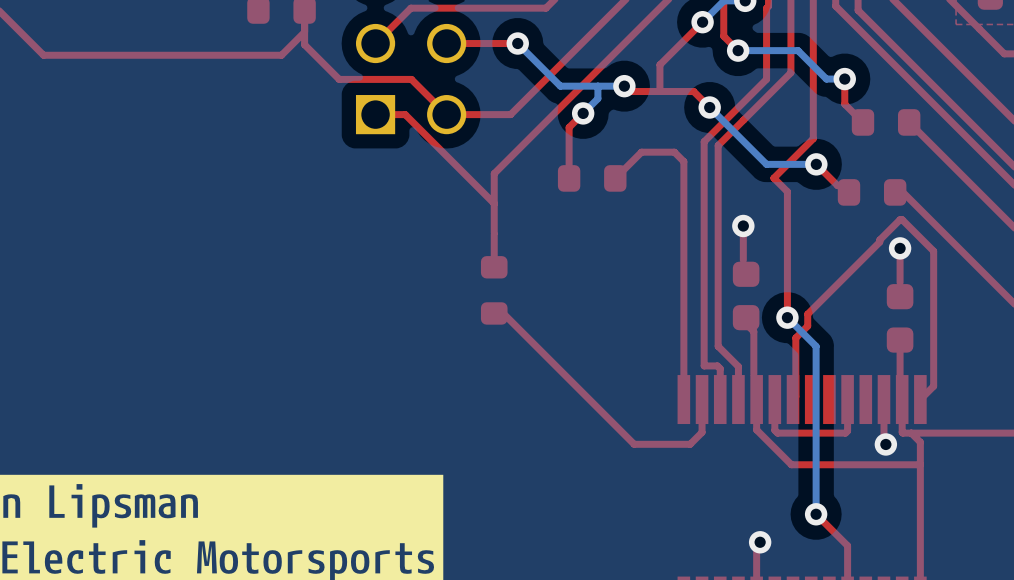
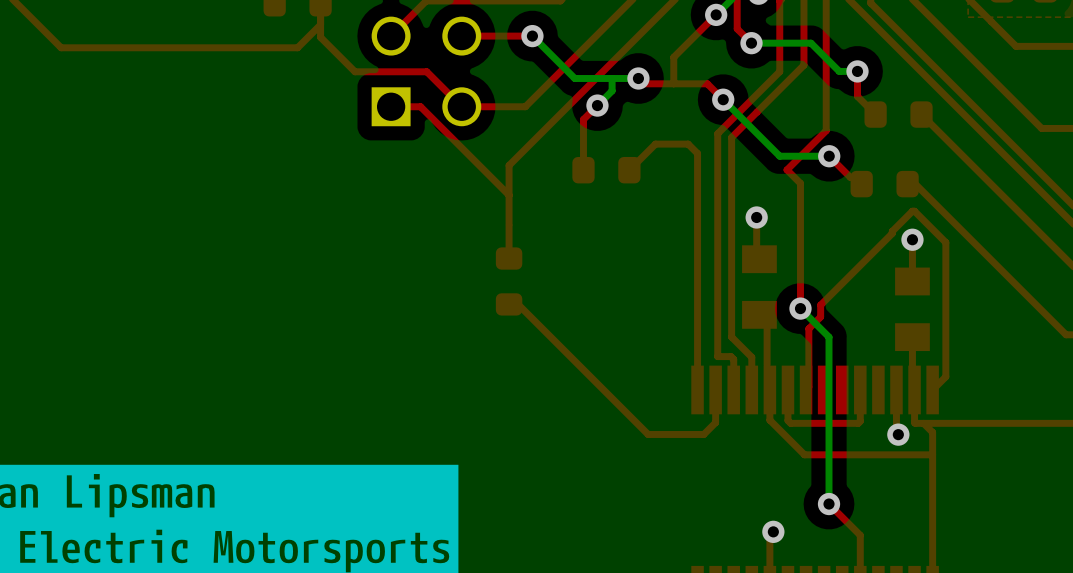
part footprint: [732, 261, 760, 331] -> [742, 245, 777, 329]
part footprint: [886, 284, 914, 353] -> [895, 267, 930, 352]

